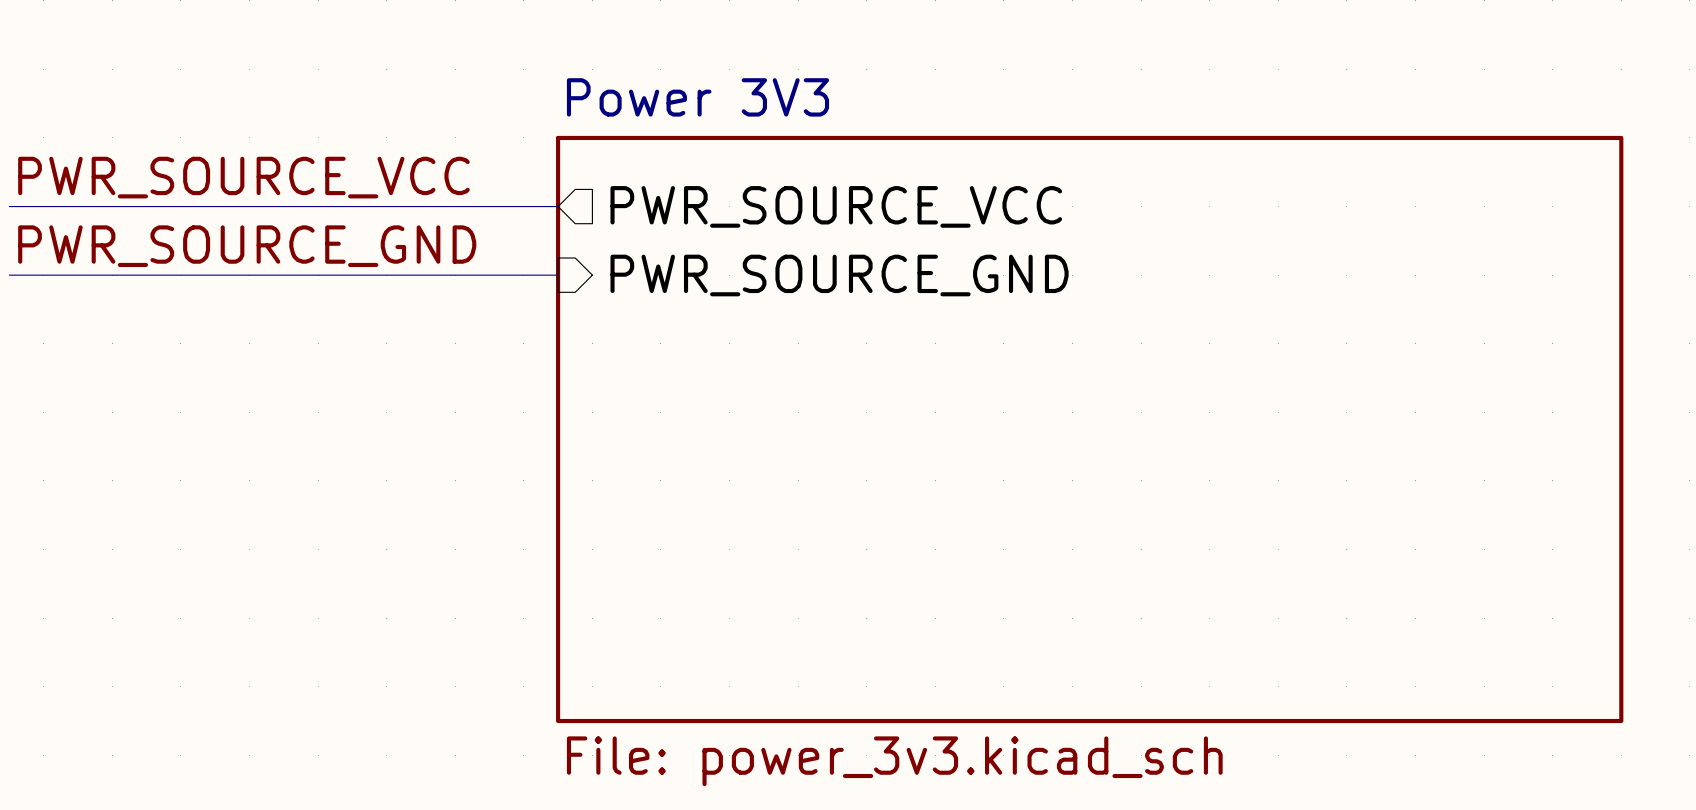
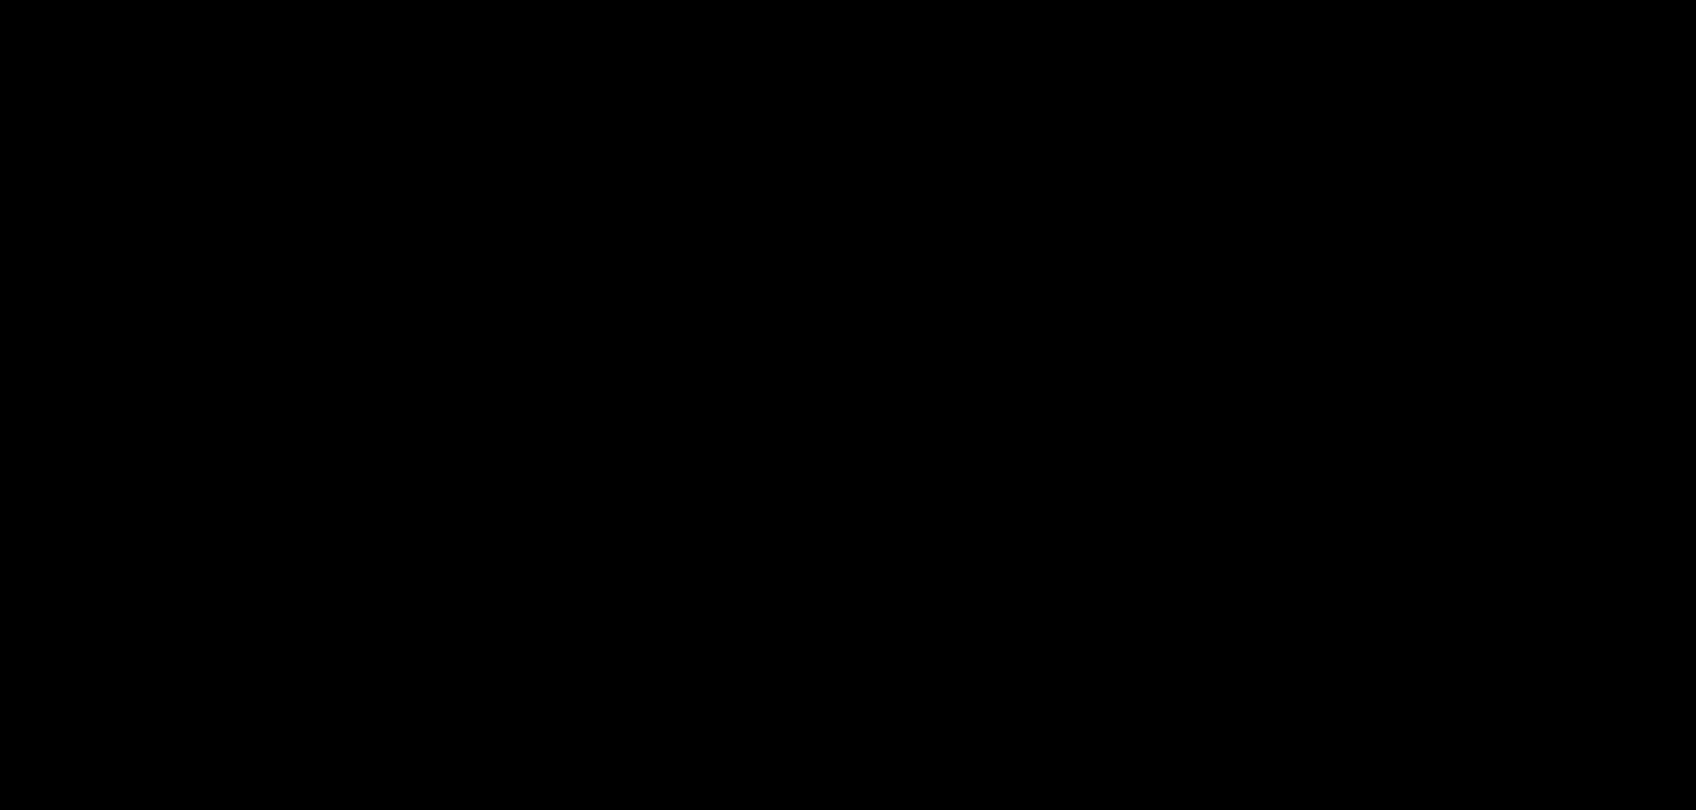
label: PWR_SOURCE_VCC (243, 177) -> none
wire: (9, 206) (558, 206) -> none
sheet pin: PWR_SOURCE_VCC (836, 206) -> none
label: PWR_SOURCE_GND (247, 246) -> none
wire: (9, 275) (558, 275) -> none
sheet pin: PWR_SOURCE_GND (839, 275) -> none
sheet Power 3V3: File: power_3v3.kicad_sch (1089, 429) -> none

